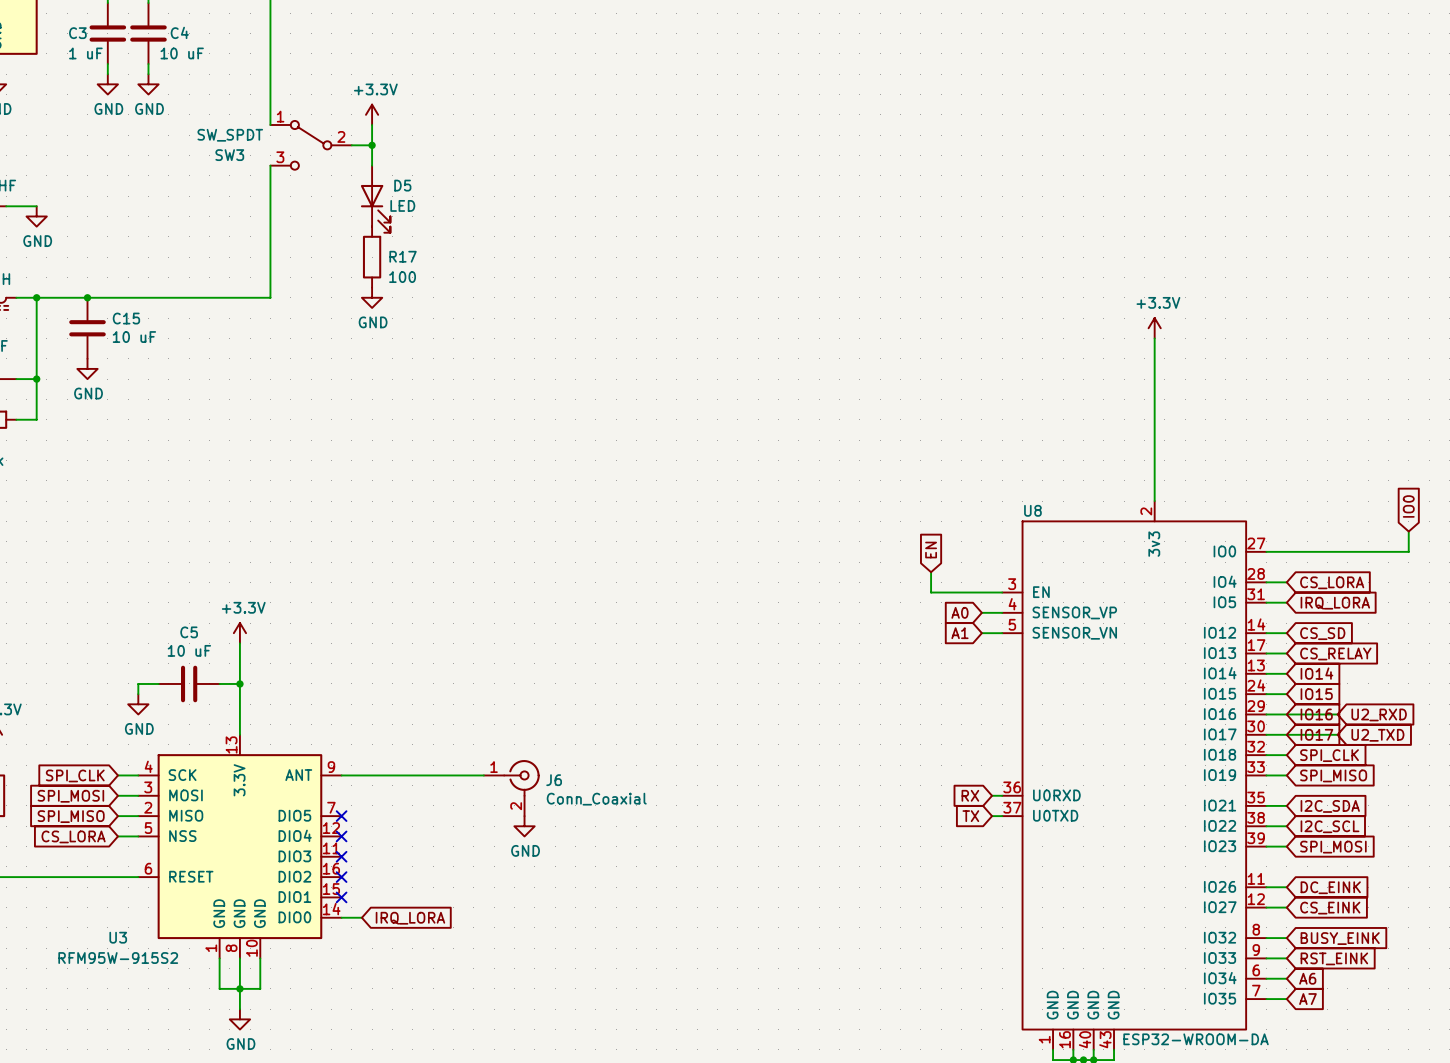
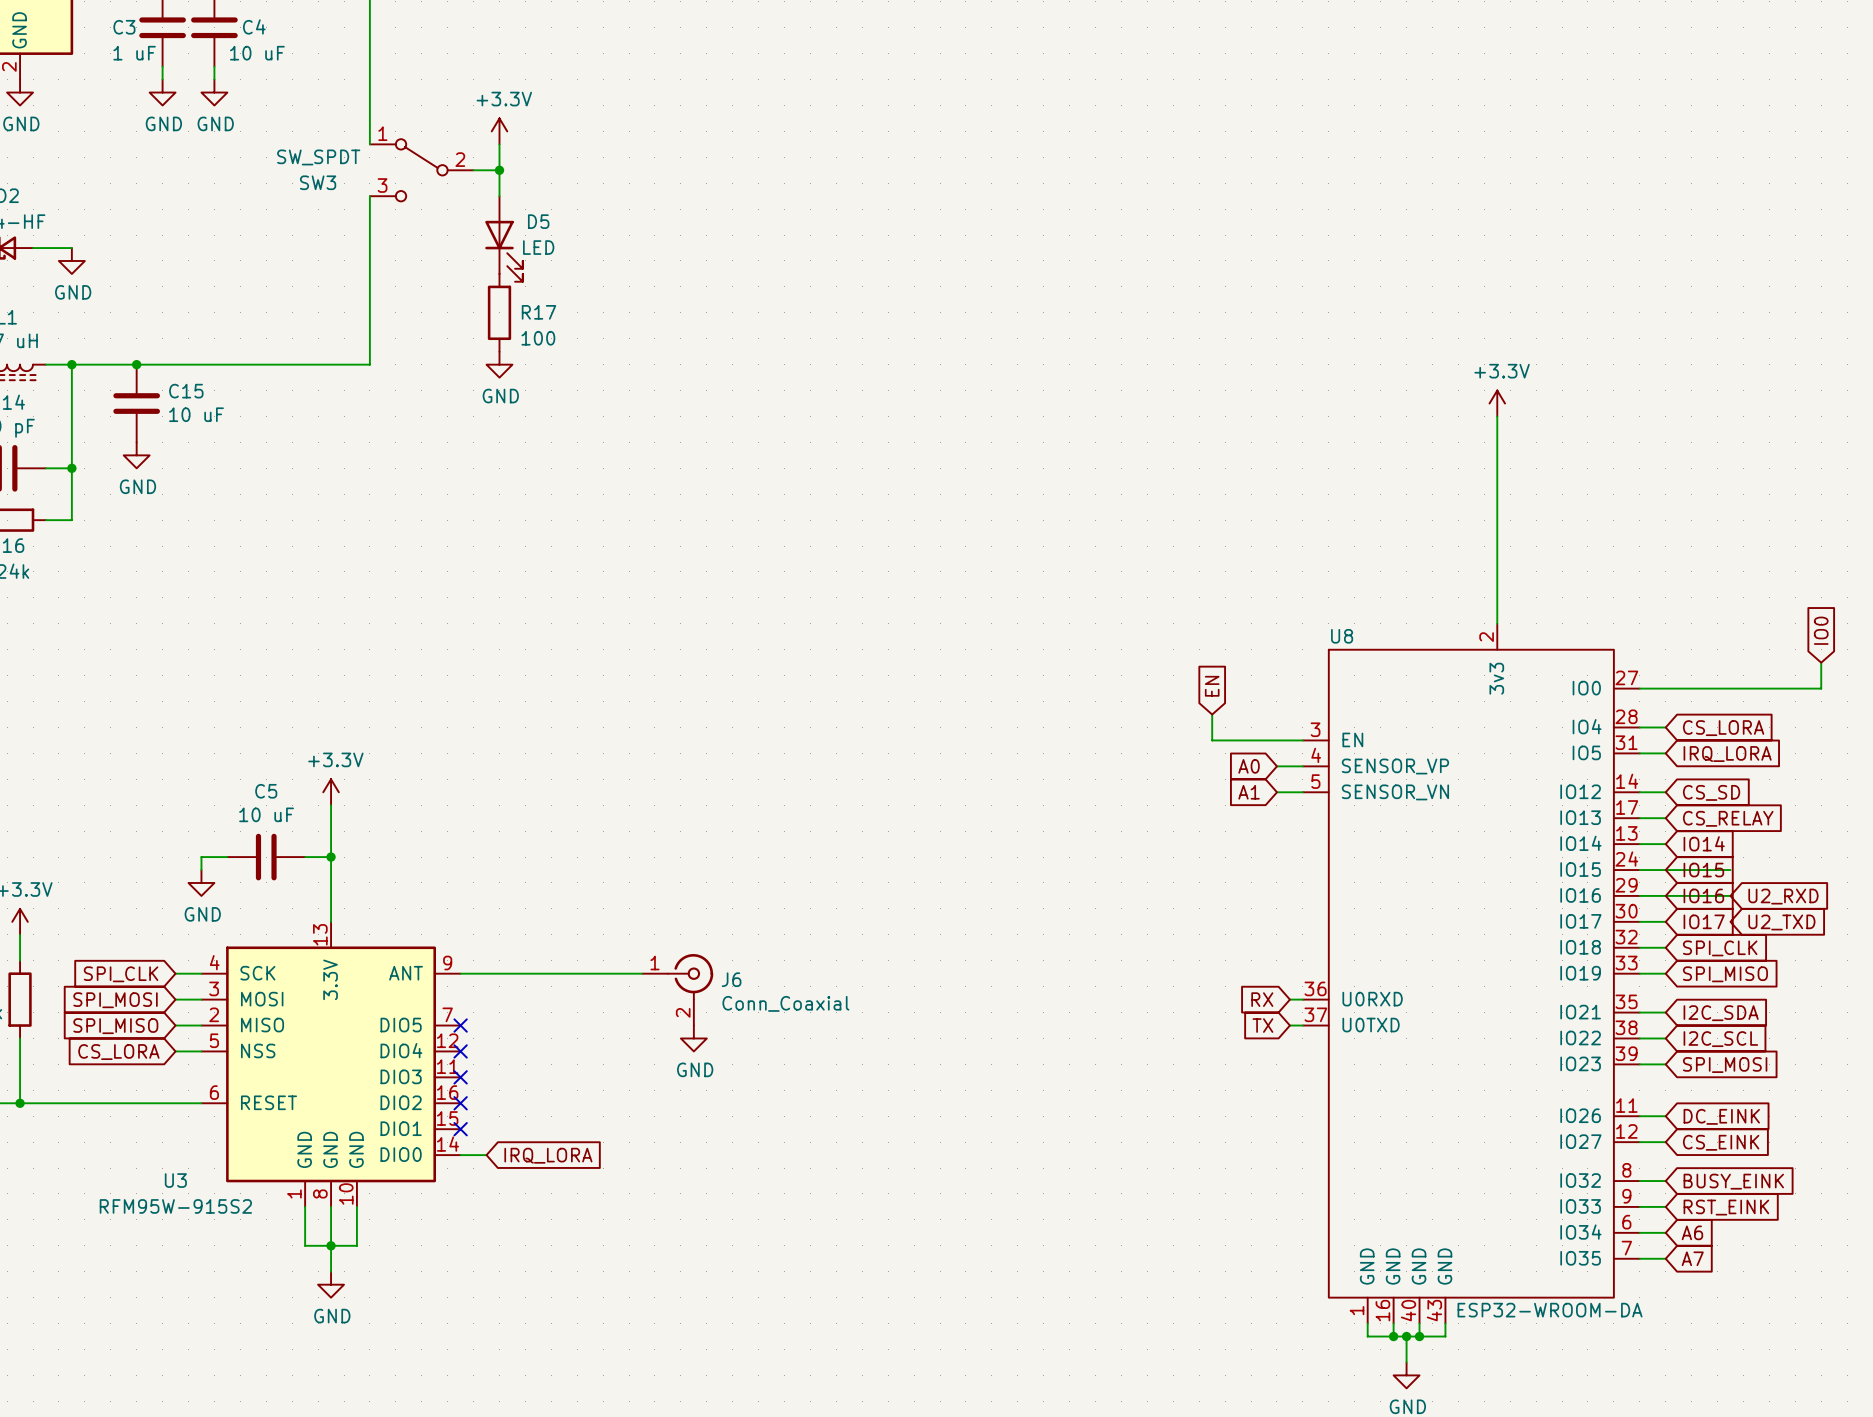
wire: (1286, 734) (1337, 734) -> (1665, 870) (1730, 870)

